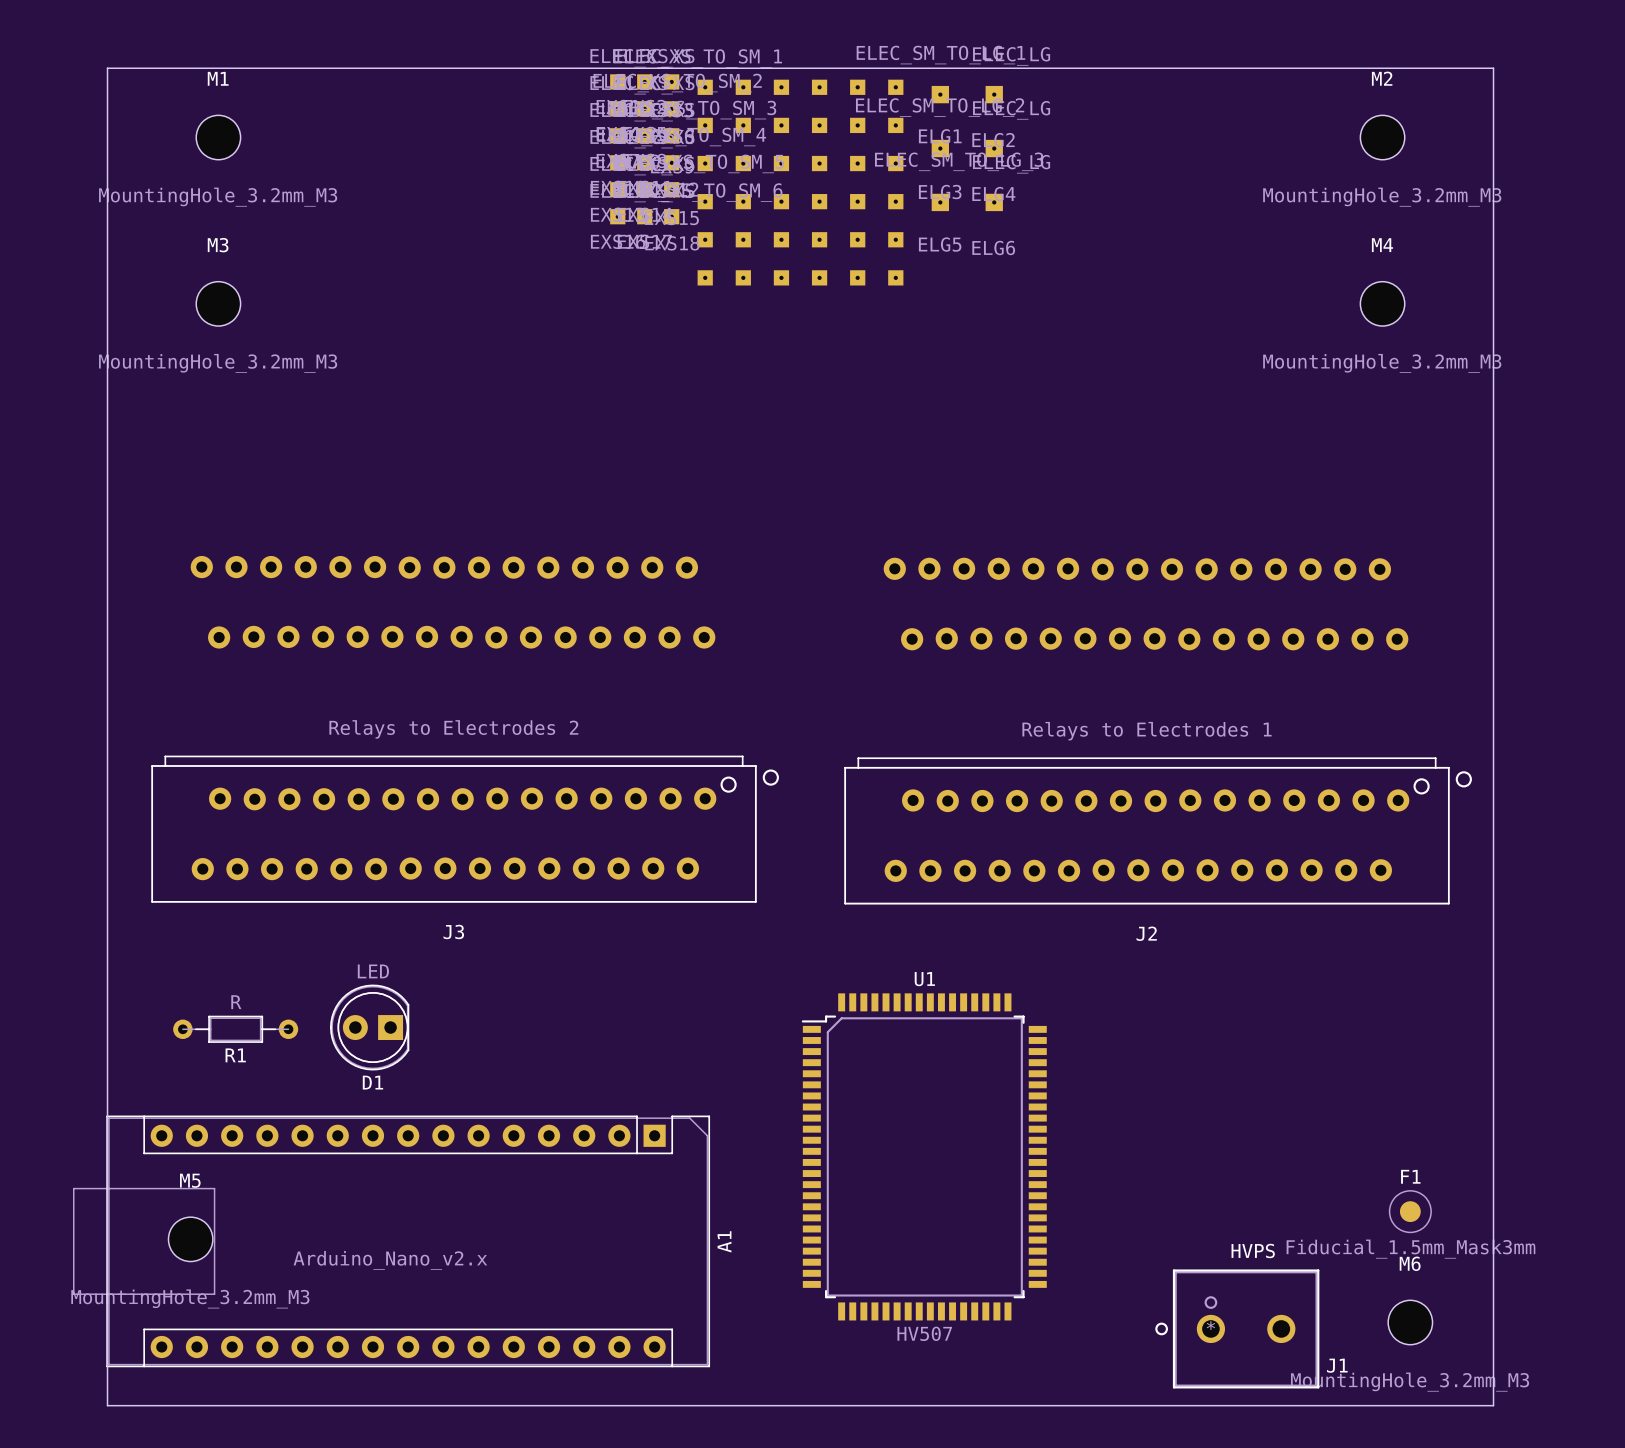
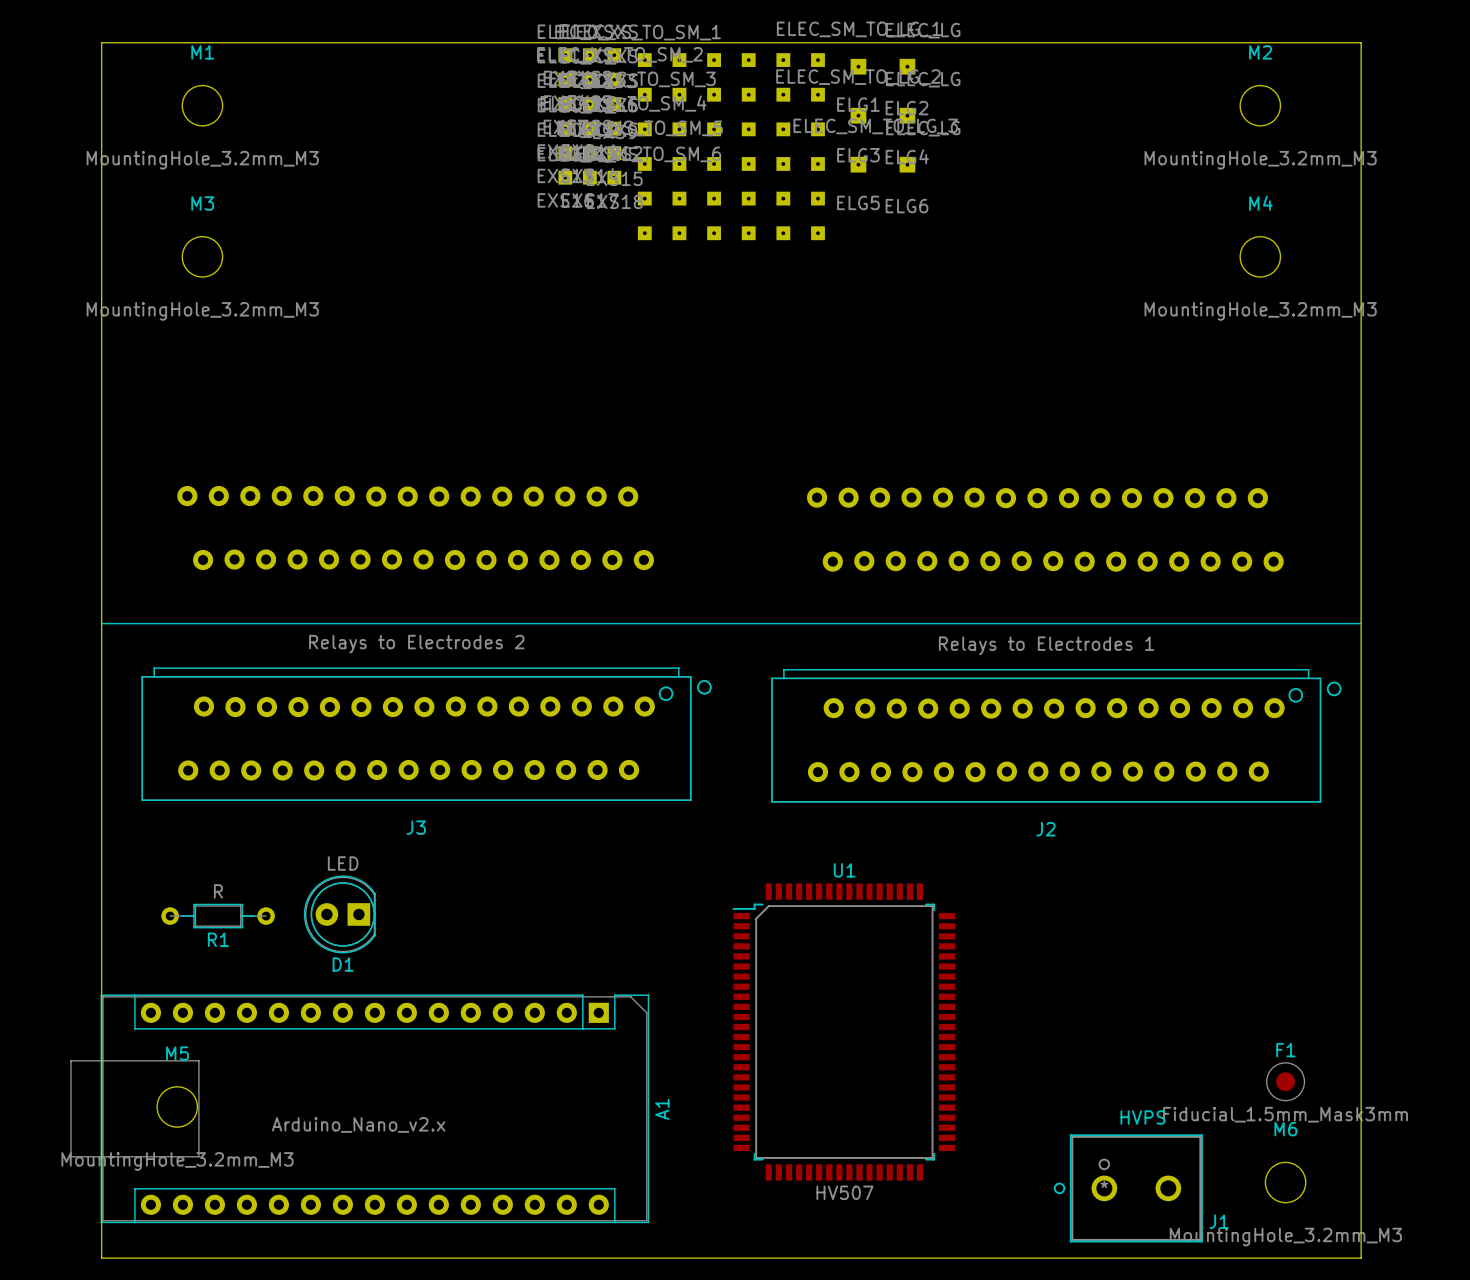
line: none -> (101, 623) (1361, 623)

